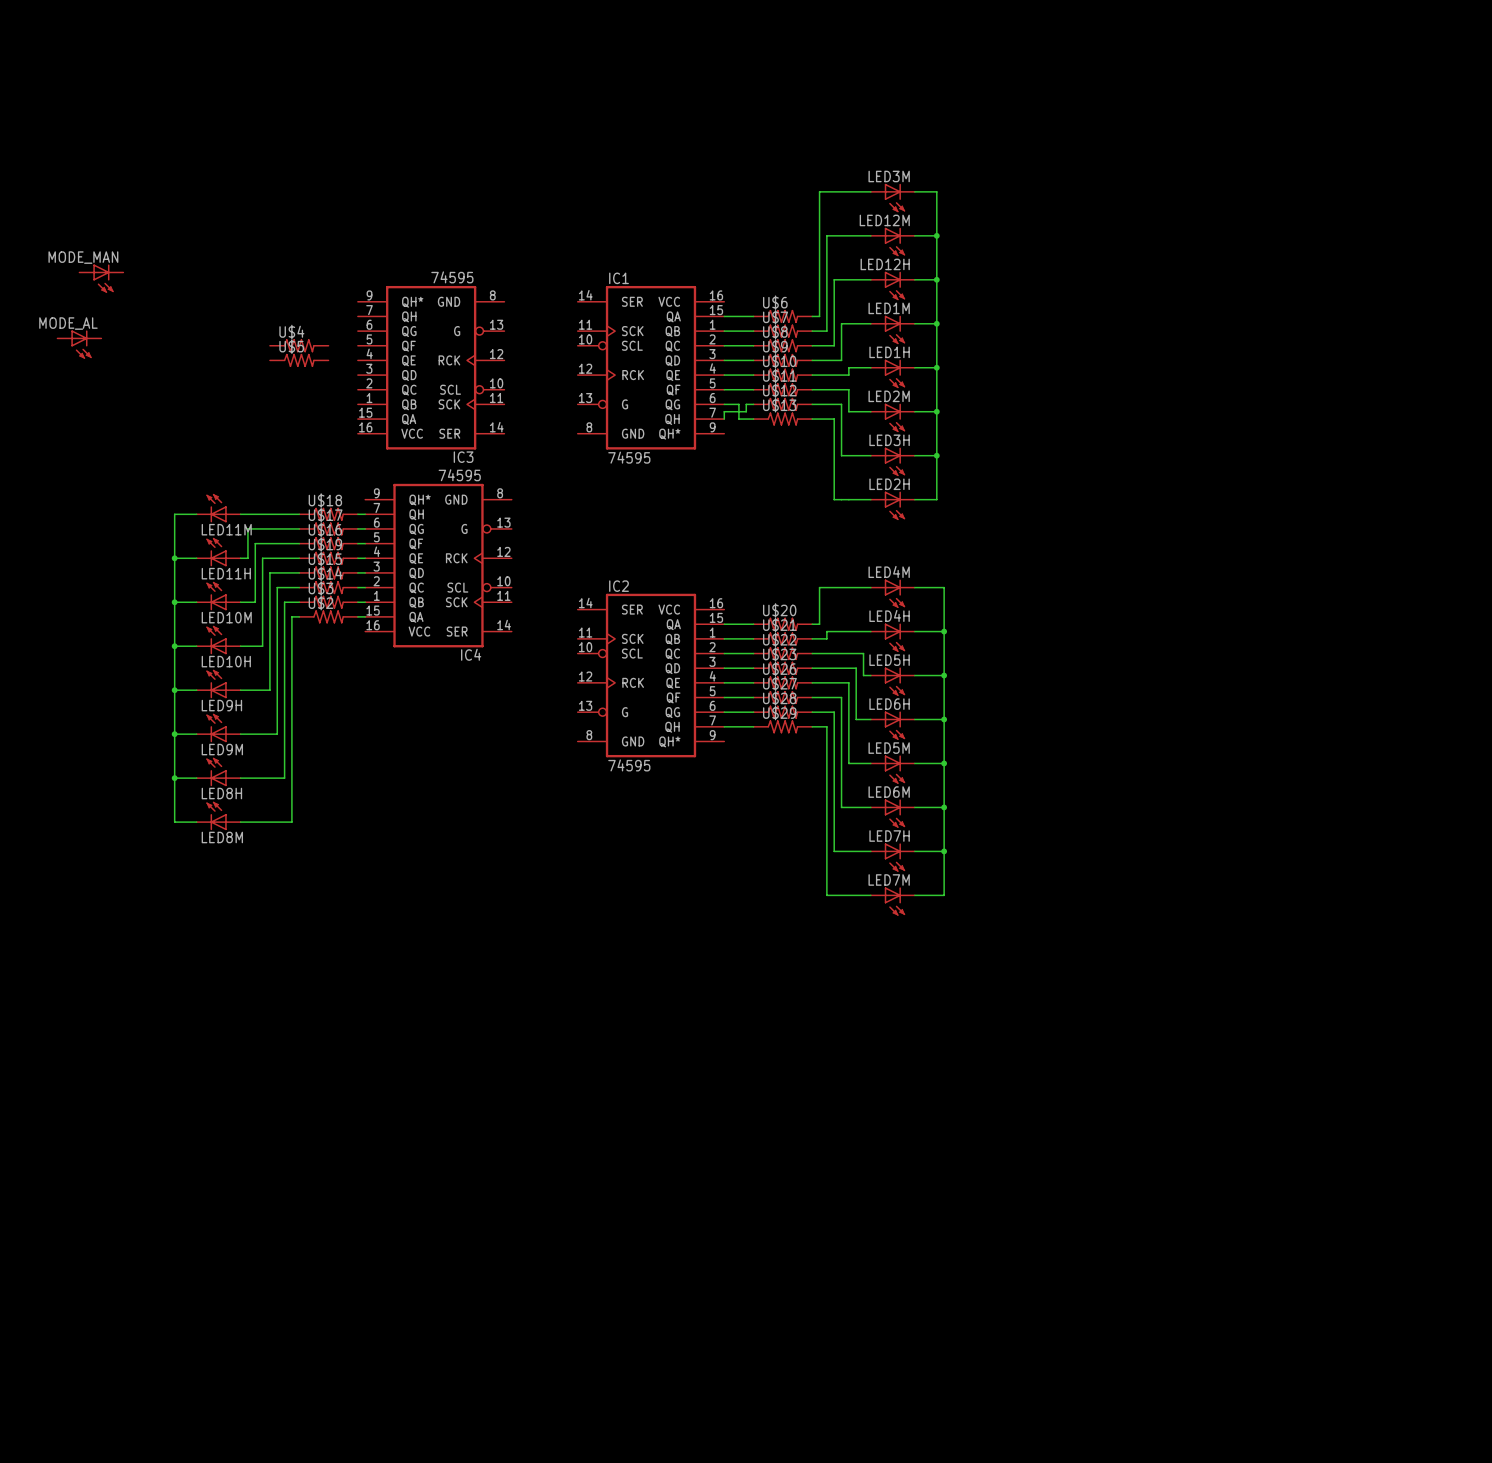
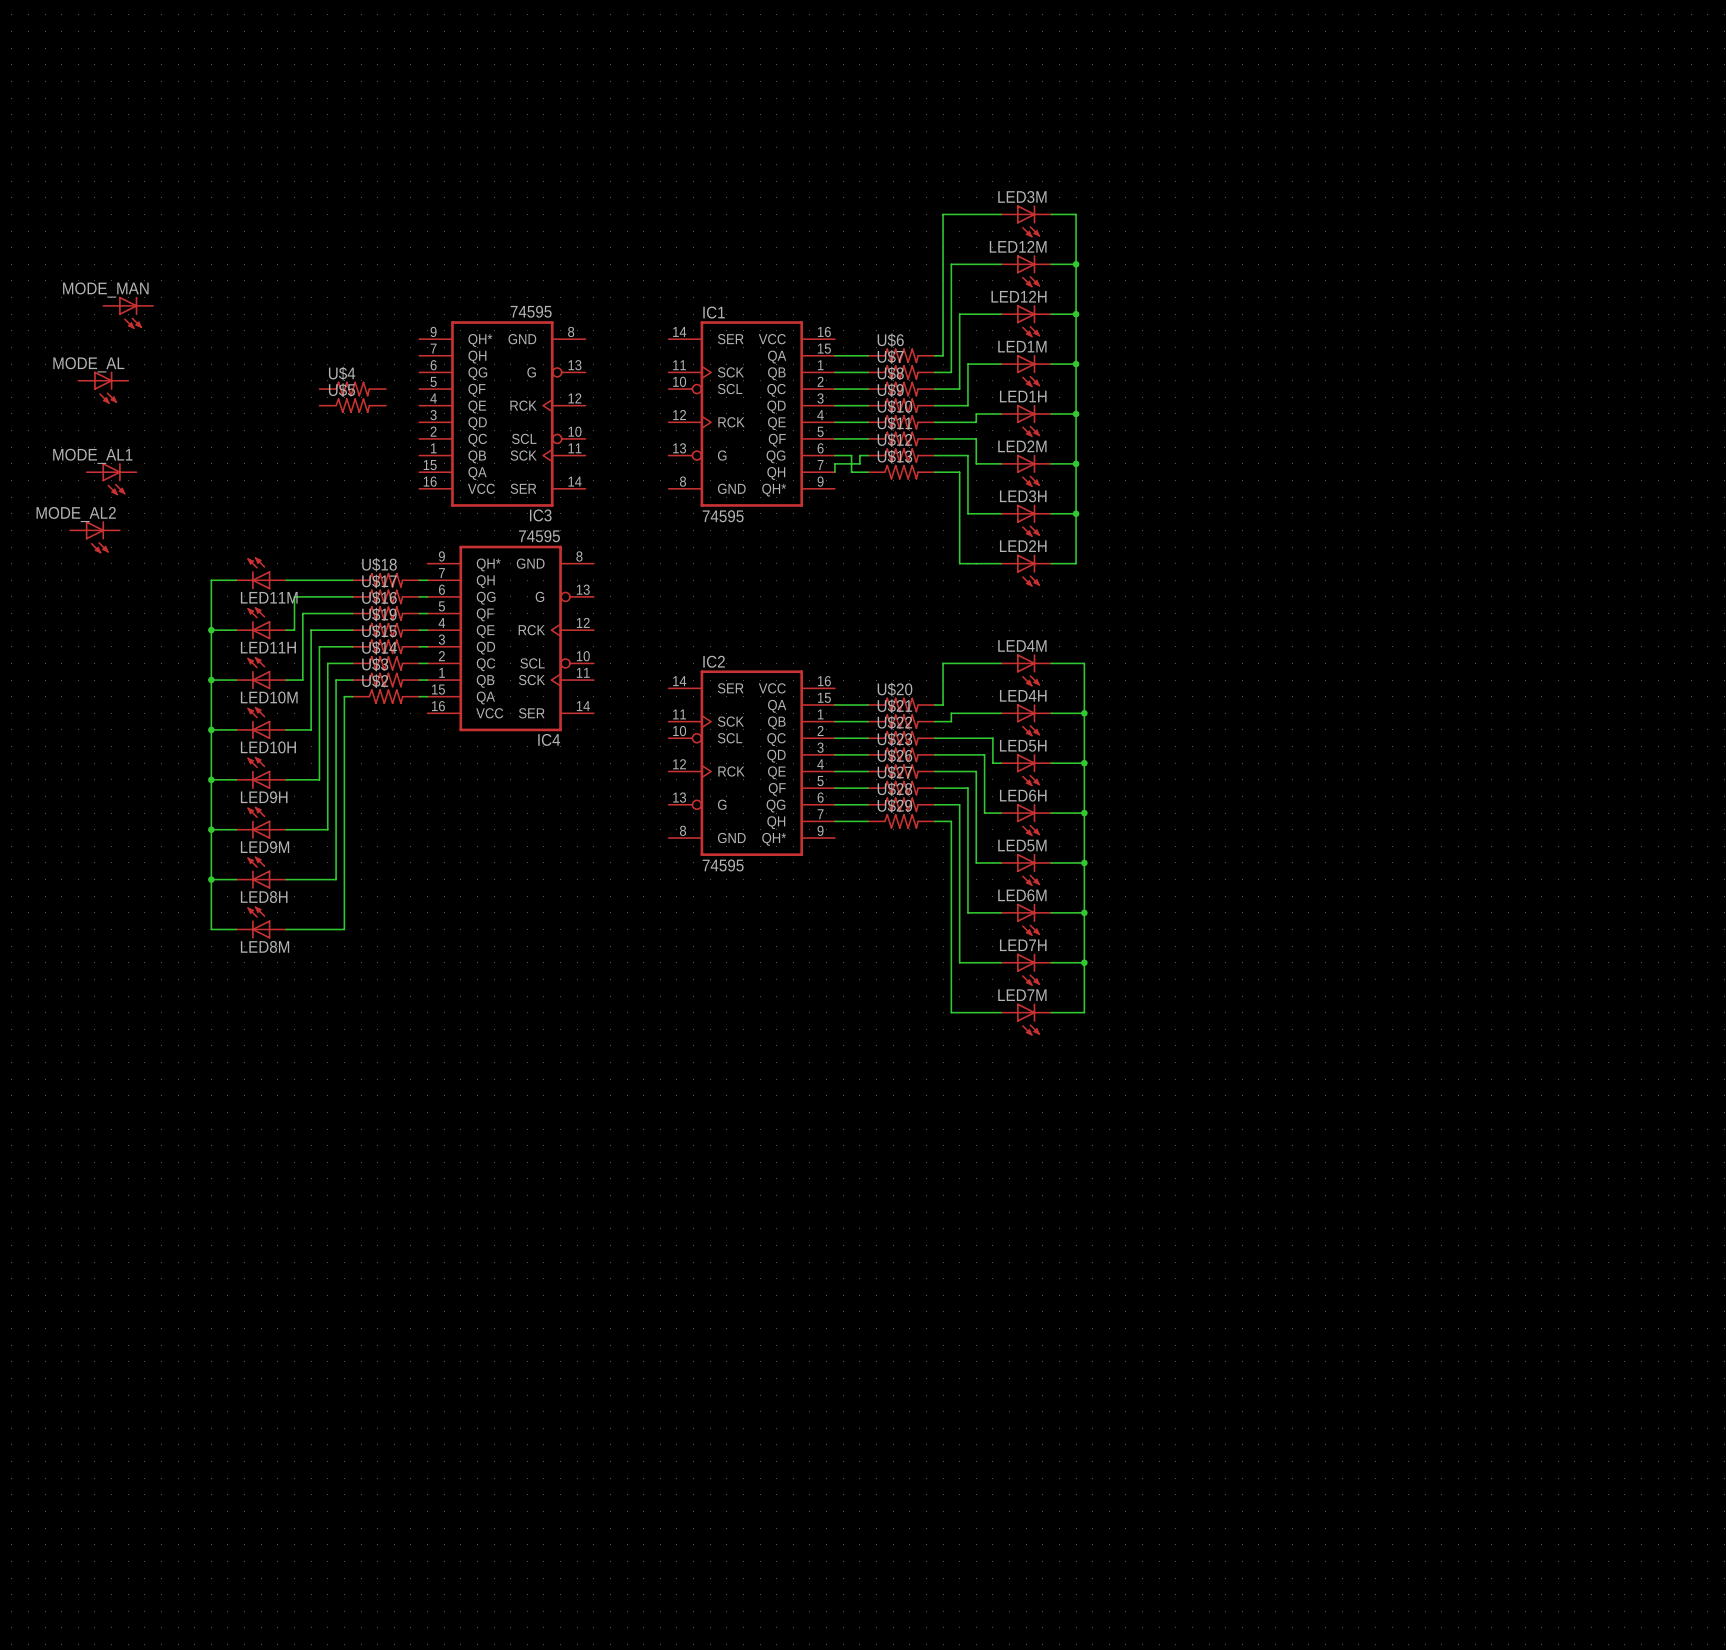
MODE_AL1: none -> (111, 479)
MODE_AL2: none -> (94, 537)

